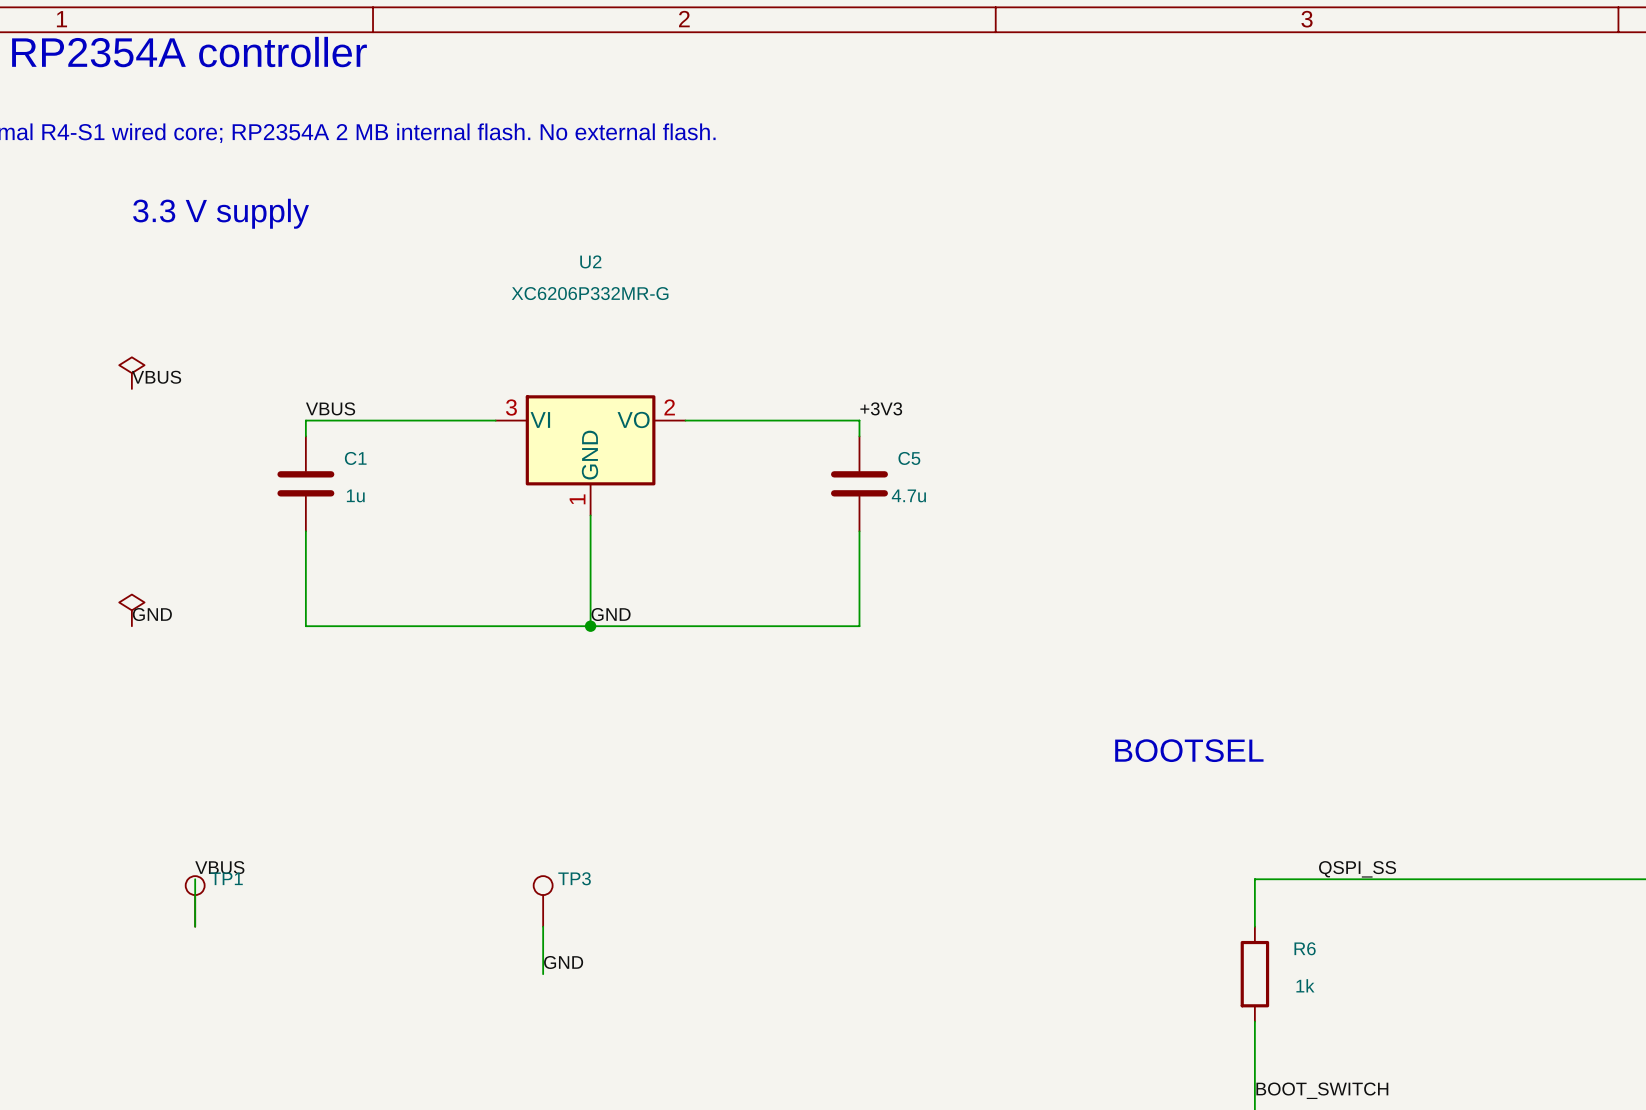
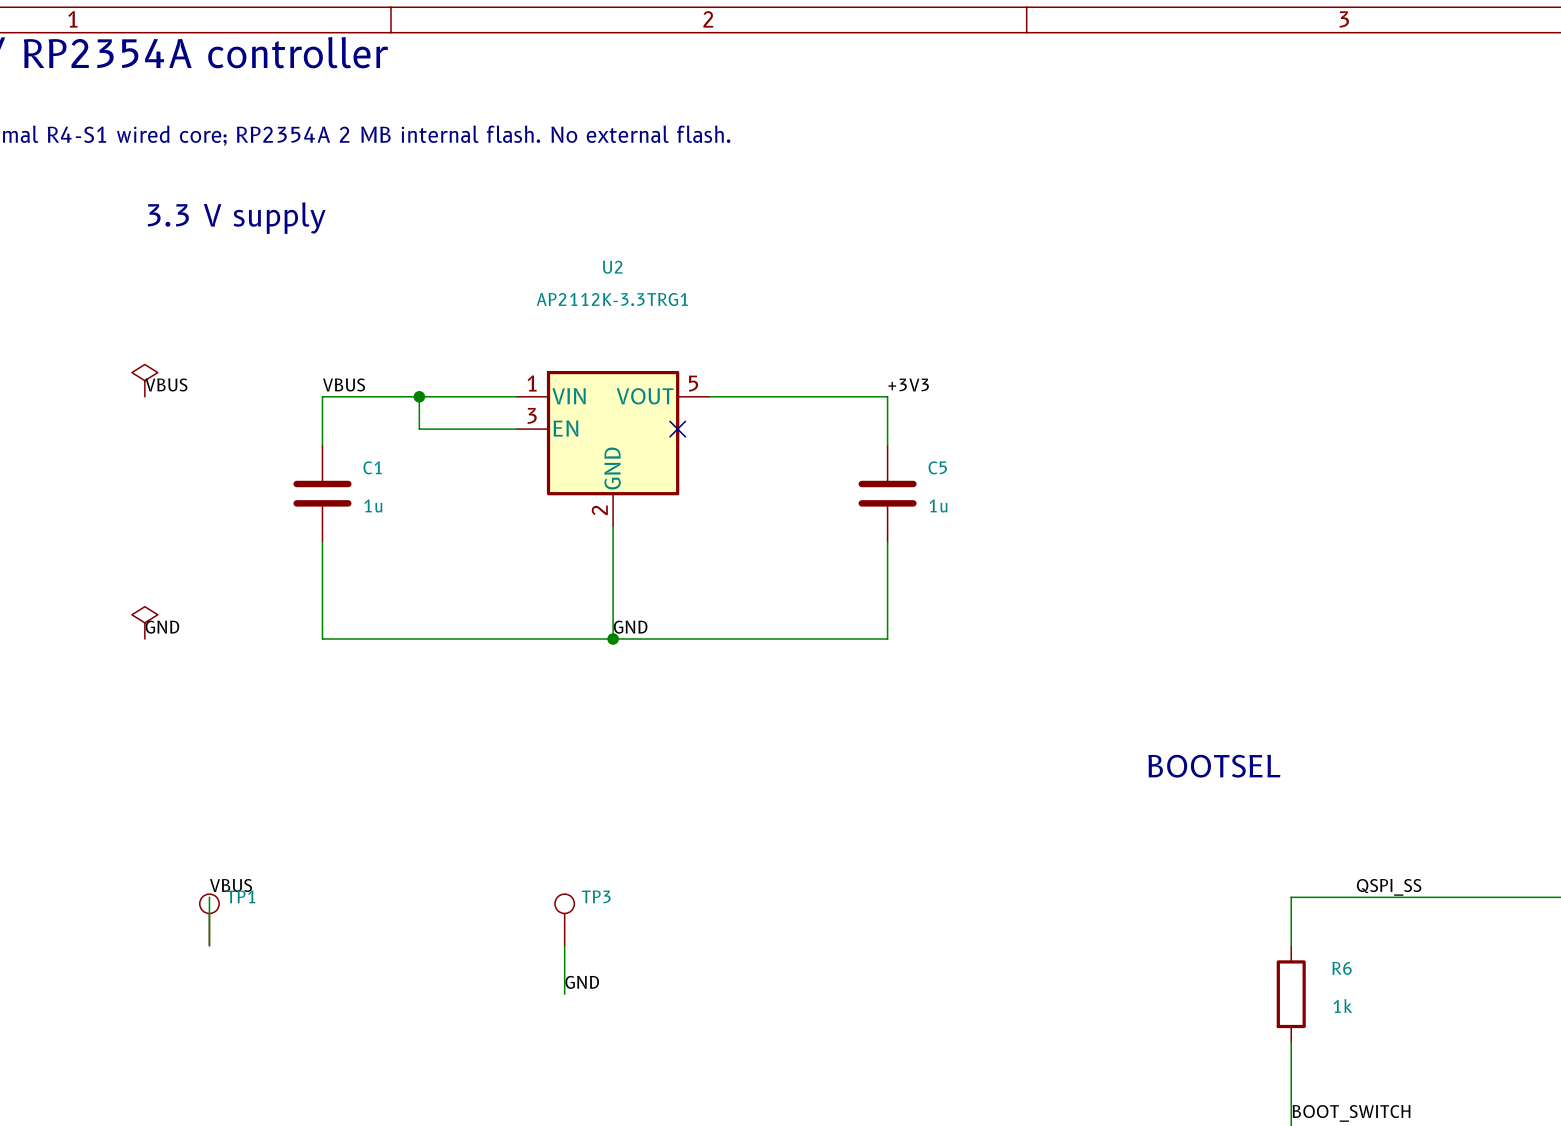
U2 value: XC6206P332MR-G (590, 293) -> AP2112K-3.3TRG1 (612, 299)
junction: none -> (419, 396)
wire: none -> (516, 396) (322, 396) (322, 429)
U2 symbol: [495, 395, 686, 516] -> [516, 370, 710, 526]
label position: VBUS (330, 408) -> VBUS (344, 384)
label position: +3V3 (881, 408) -> +3V3 (908, 384)
wire: (305, 420) (400, 420) -> (419, 396) (419, 429)
no-connect mark: none -> (677, 429)
wire: (685, 420) (859, 420) -> (709, 396) (887, 396) (887, 429)
C5 value: 4.7u (908, 495) -> 1u (938, 505)

